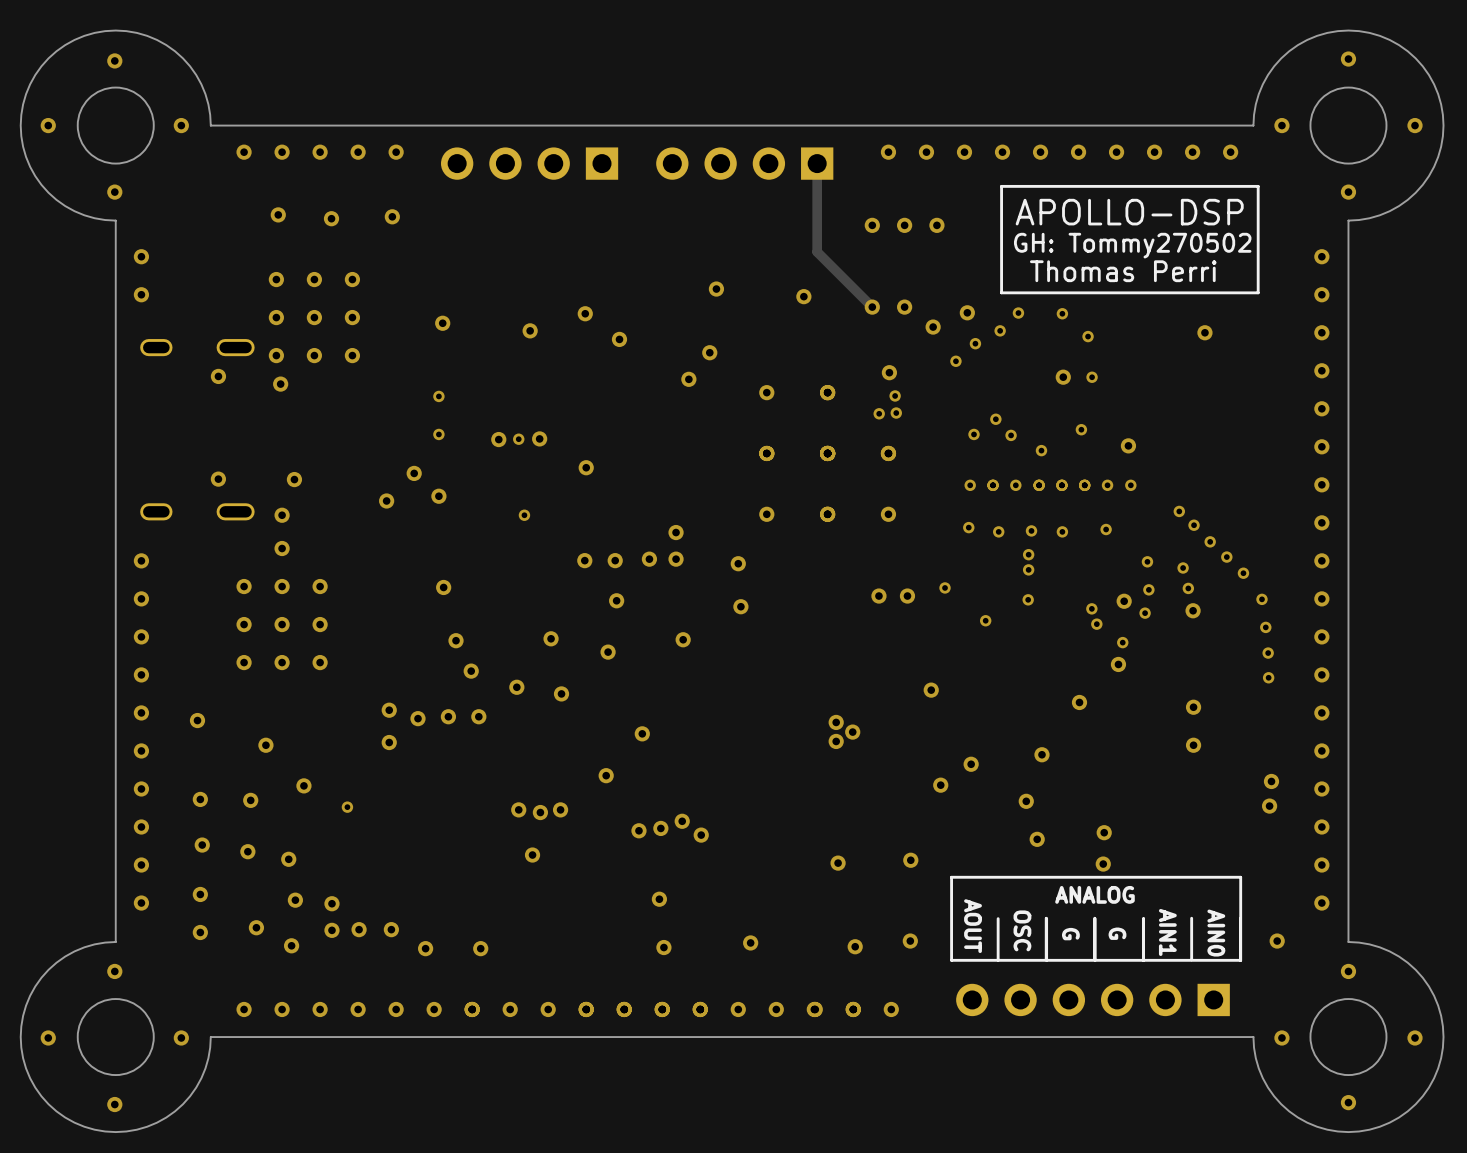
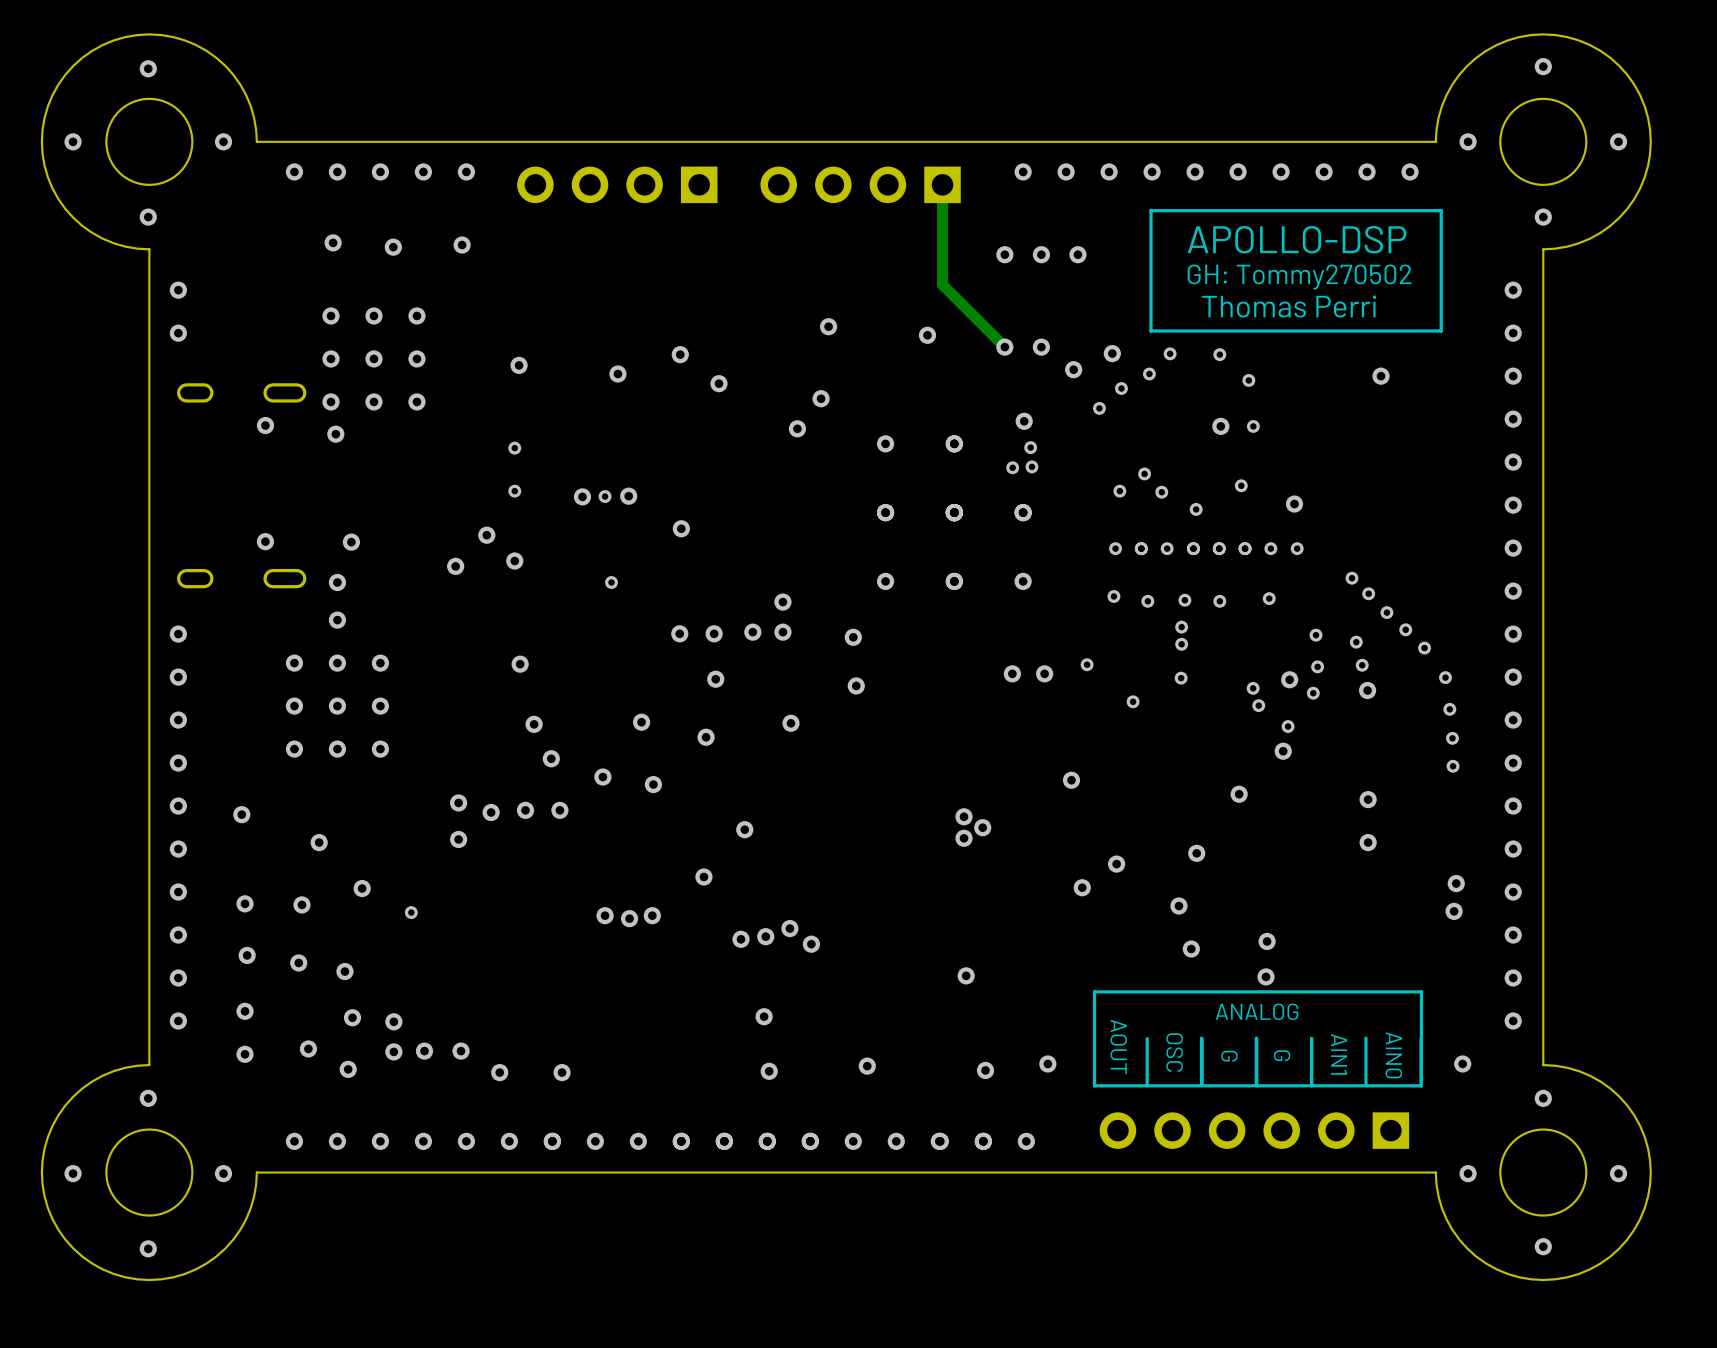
via: (532, 855) -> none
via: (910, 860) -> none

